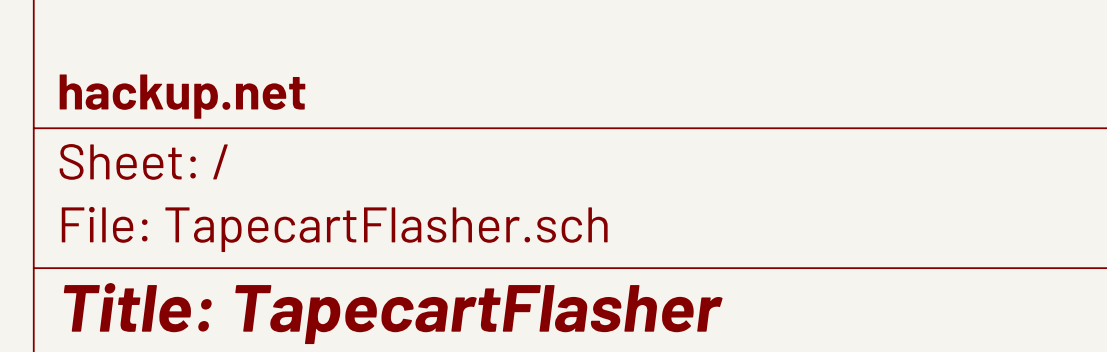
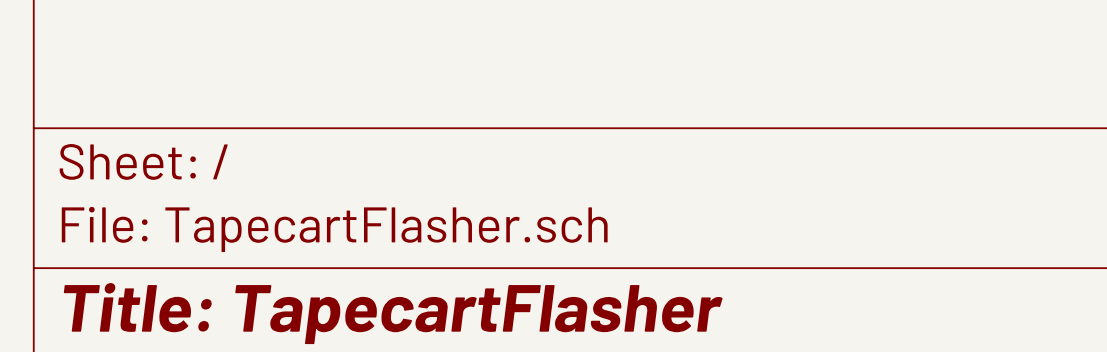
title block: hackup.net (182, 96) -> none

